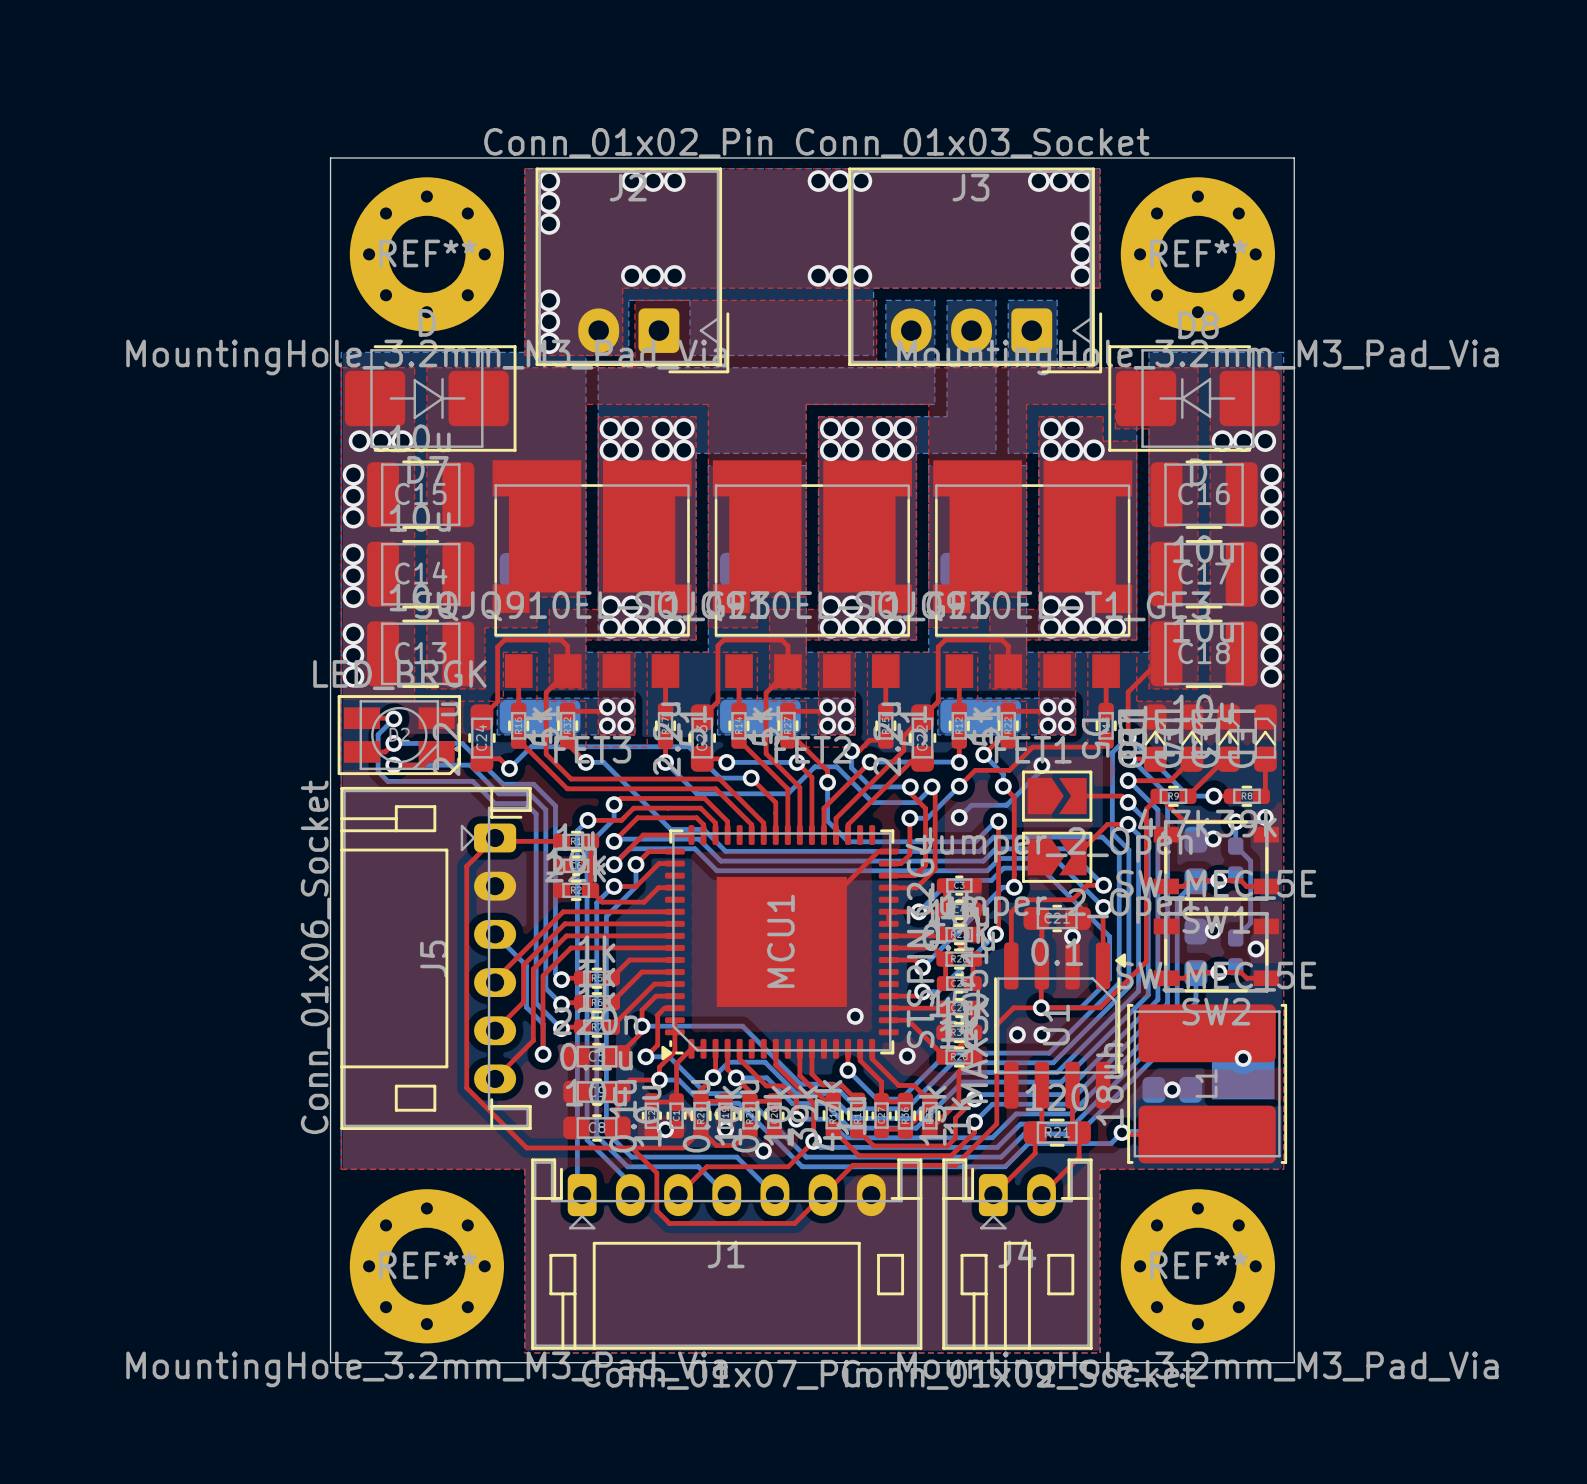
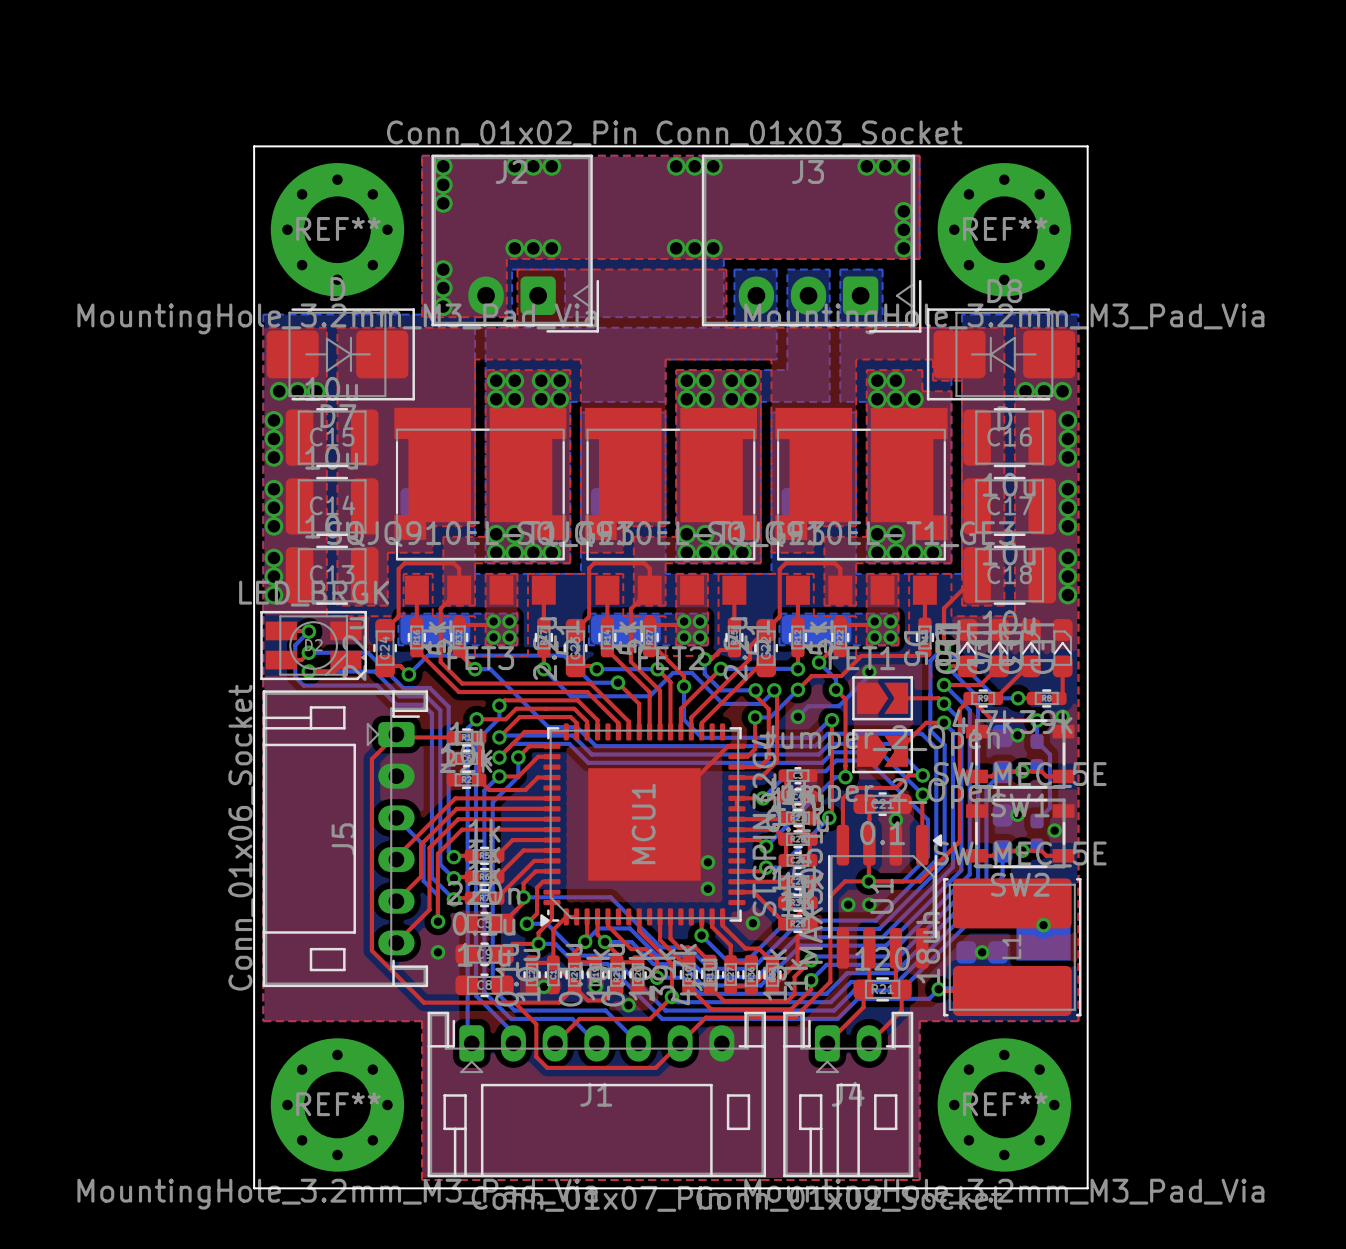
via: none -> (707, 862)

